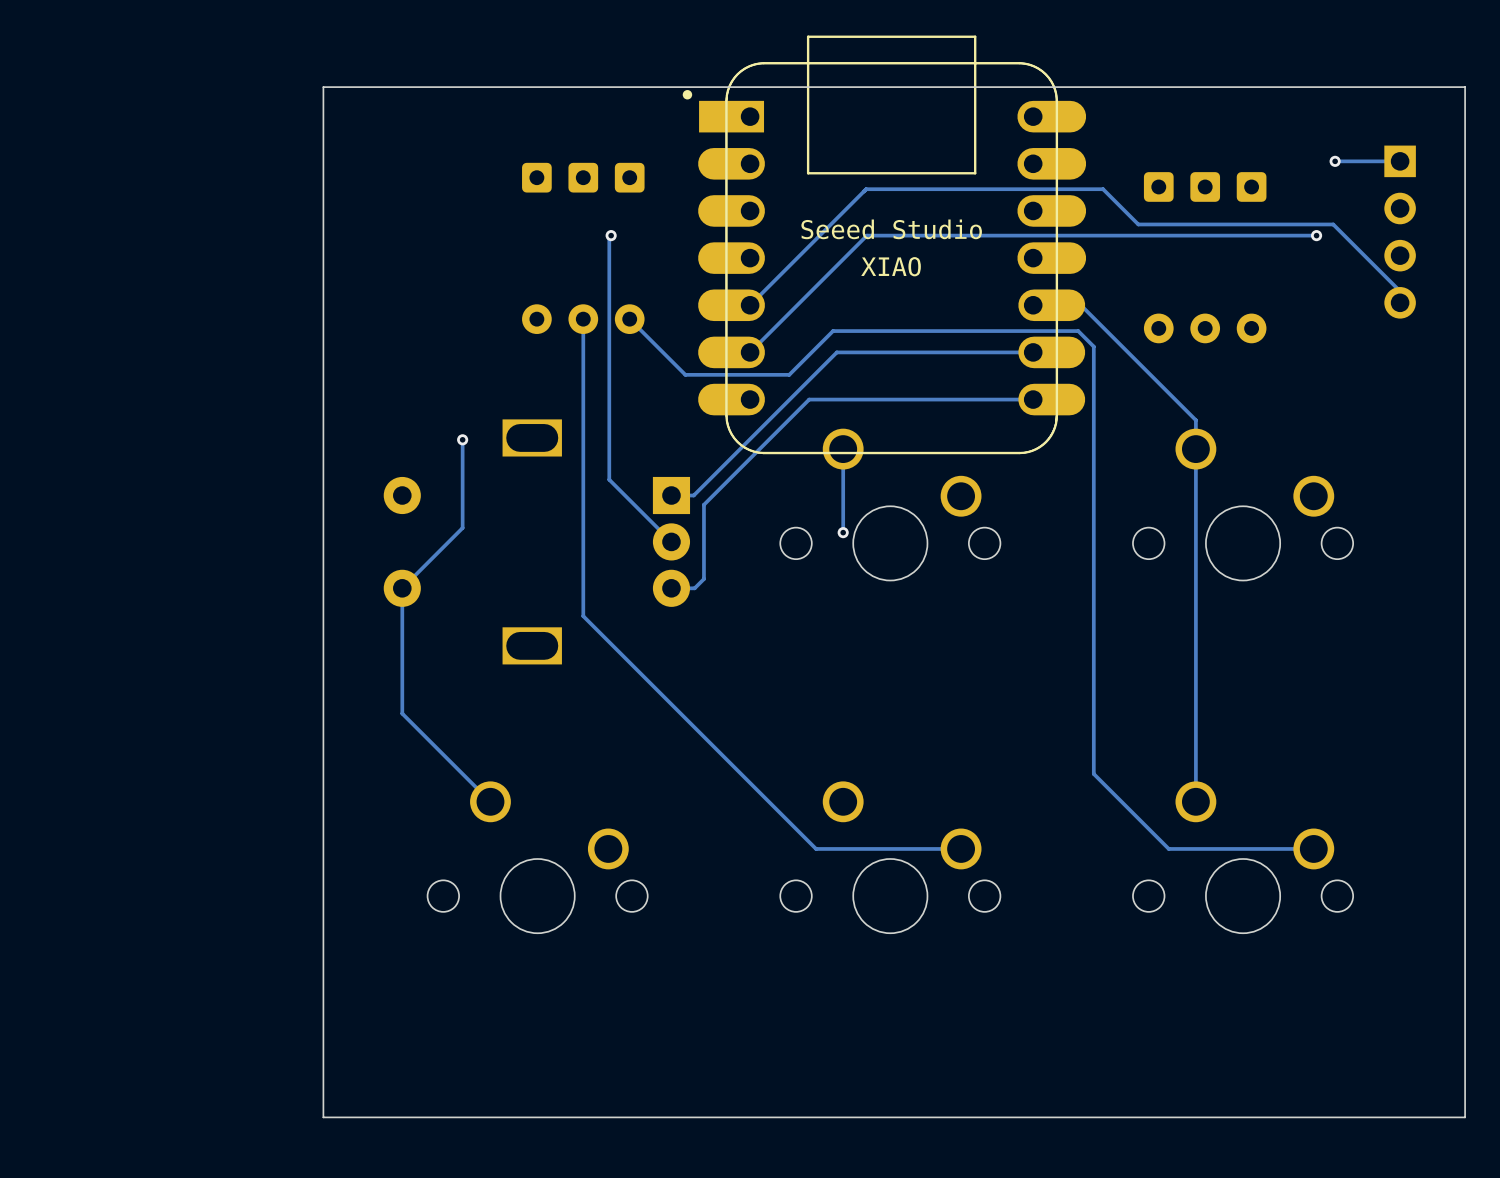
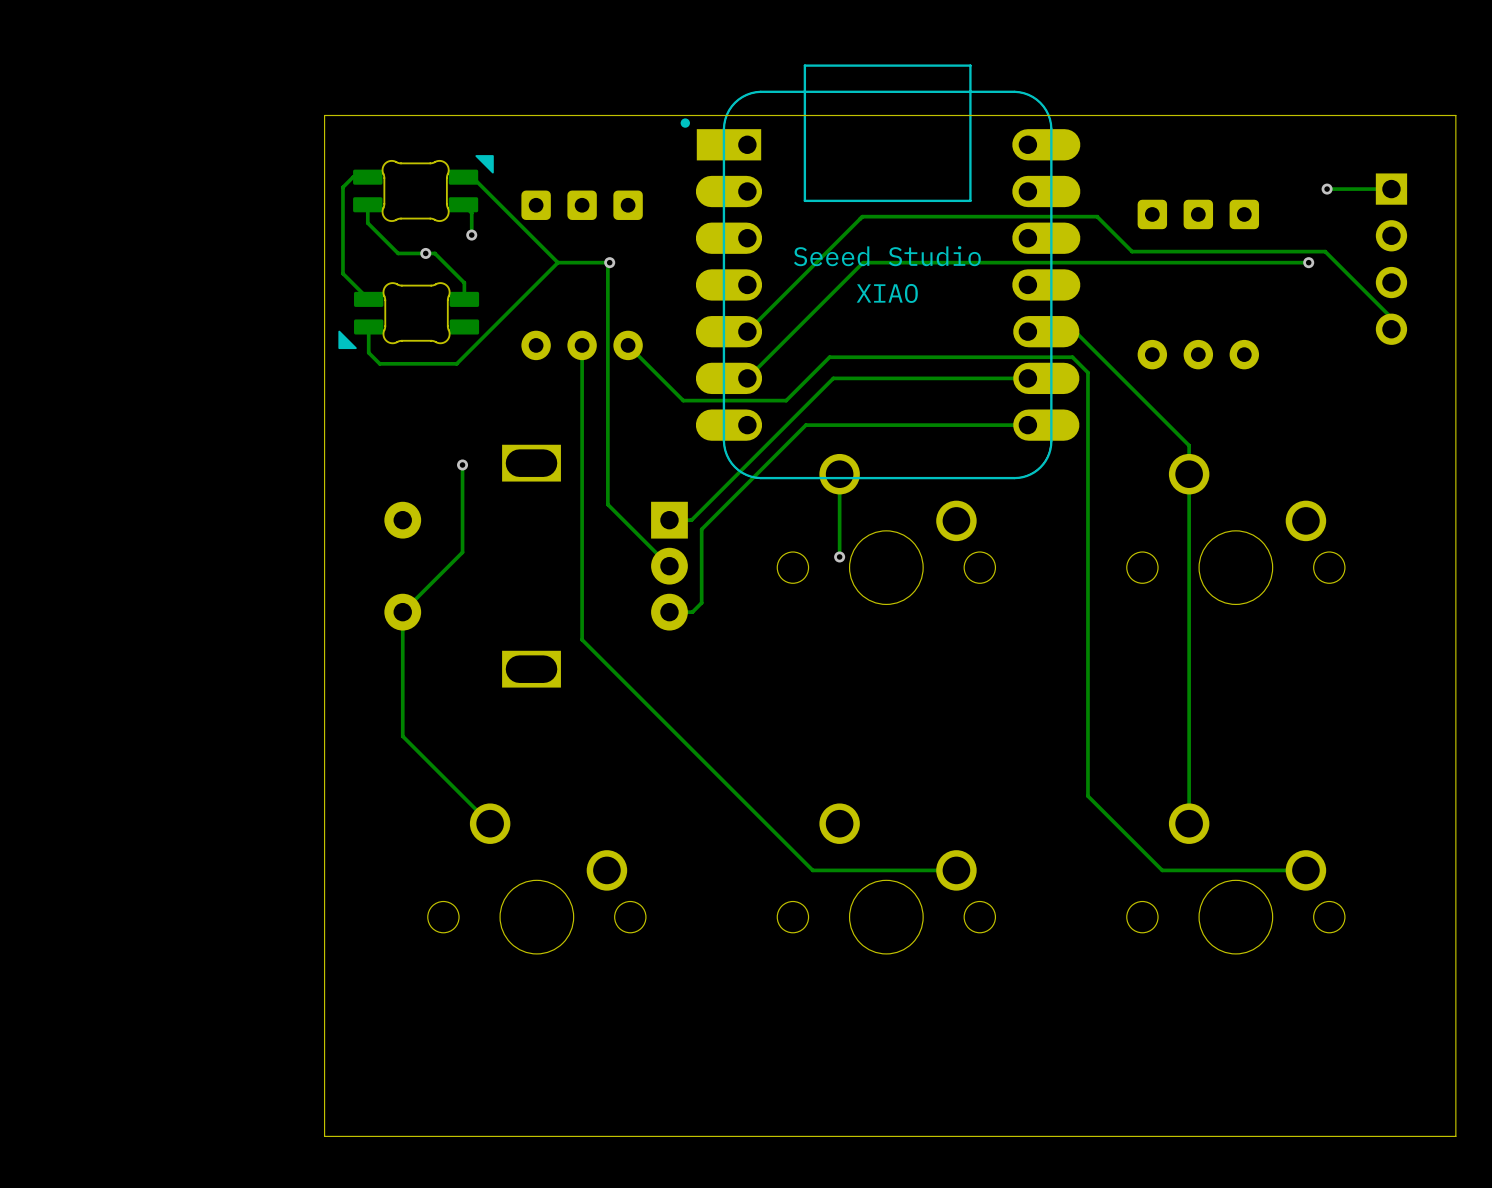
track: none -> (367, 177) (353, 177) (342, 187) (342, 273) (368, 299)
track: none -> (463, 177) (472, 177) (557, 262)
part: none -> (423, 188)
track: none -> (367, 204) (367, 223) (398, 253) (434, 253) (464, 282) (464, 299)
track: none -> (463, 204) (471, 213) (471, 235)
via: none -> (471, 235)
via: none -> (425, 253)
track: none -> (557, 262) (456, 363) (379, 363) (368, 352) (368, 326)
track: none -> (609, 262) (557, 262)
part: none -> (408, 315)

